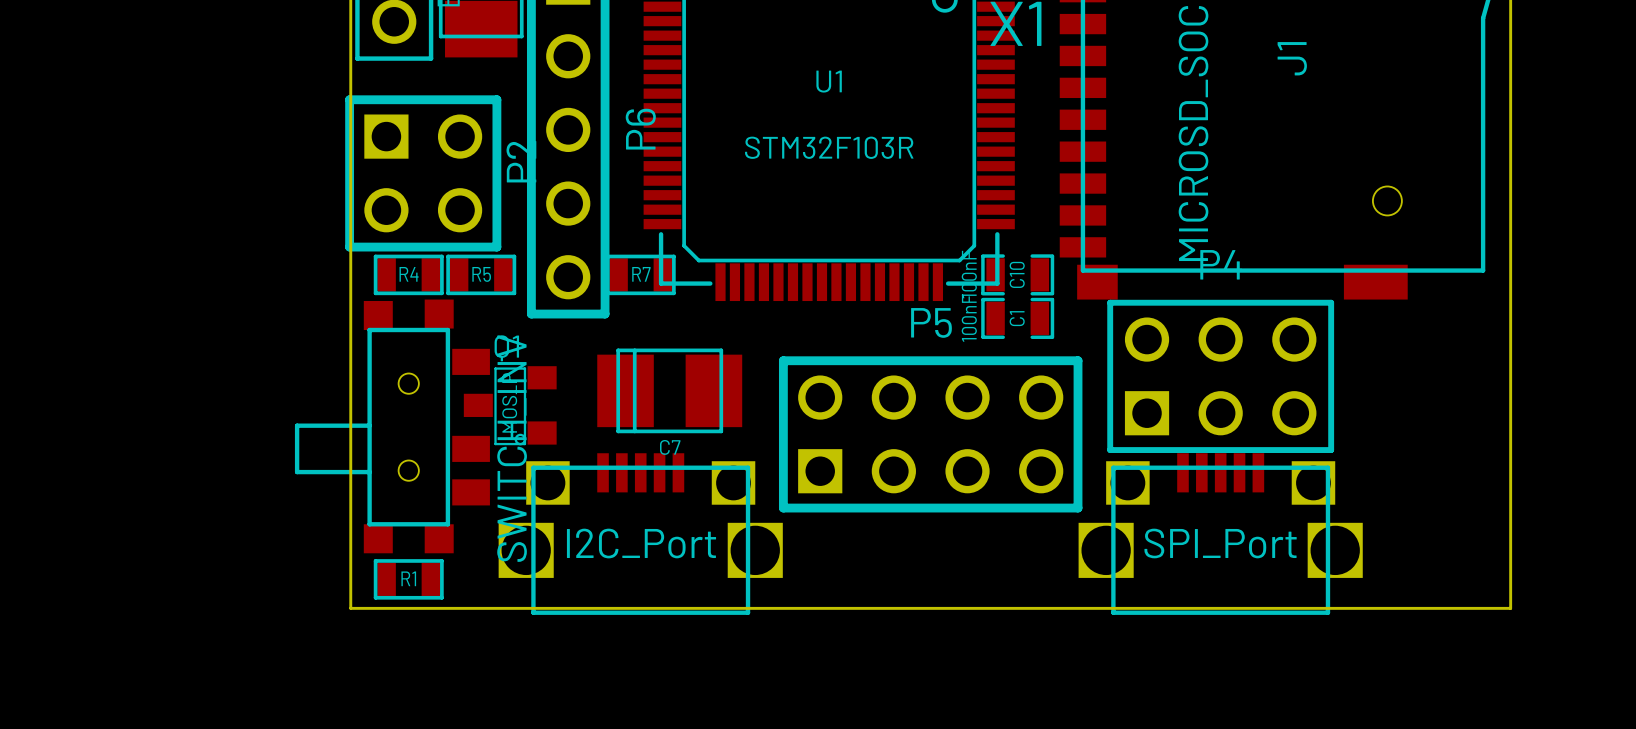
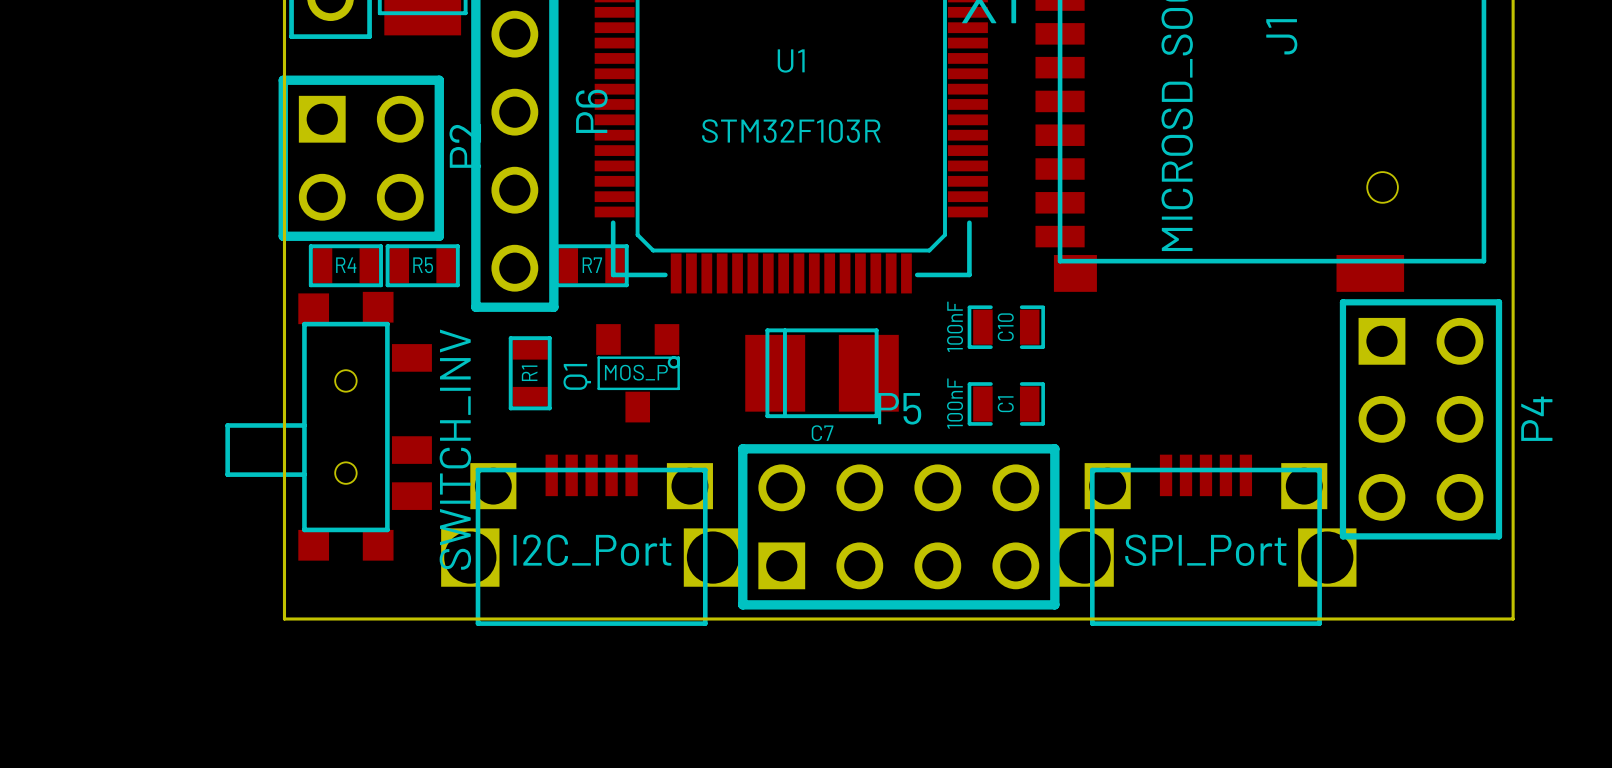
C10 position: (1017, 274) -> (1006, 327)
C1 position: (1017, 318) -> (1006, 403)
P4 rotation: 0° (1220, 376) -> 90° clockwise (1420, 419)
P4 position: (1220, 376) -> (1420, 419)
C7 position: (669, 390) -> (822, 373)
Q1 rotation: 0° (510, 405) -> 90° counterclockwise (638, 373)
Q1 position: (510, 405) -> (638, 373)
P5 position: (930, 434) -> (898, 526)
R1 rotation: 0° (408, 579) -> 90° clockwise (530, 373)
R1 position: (408, 579) -> (530, 373)

